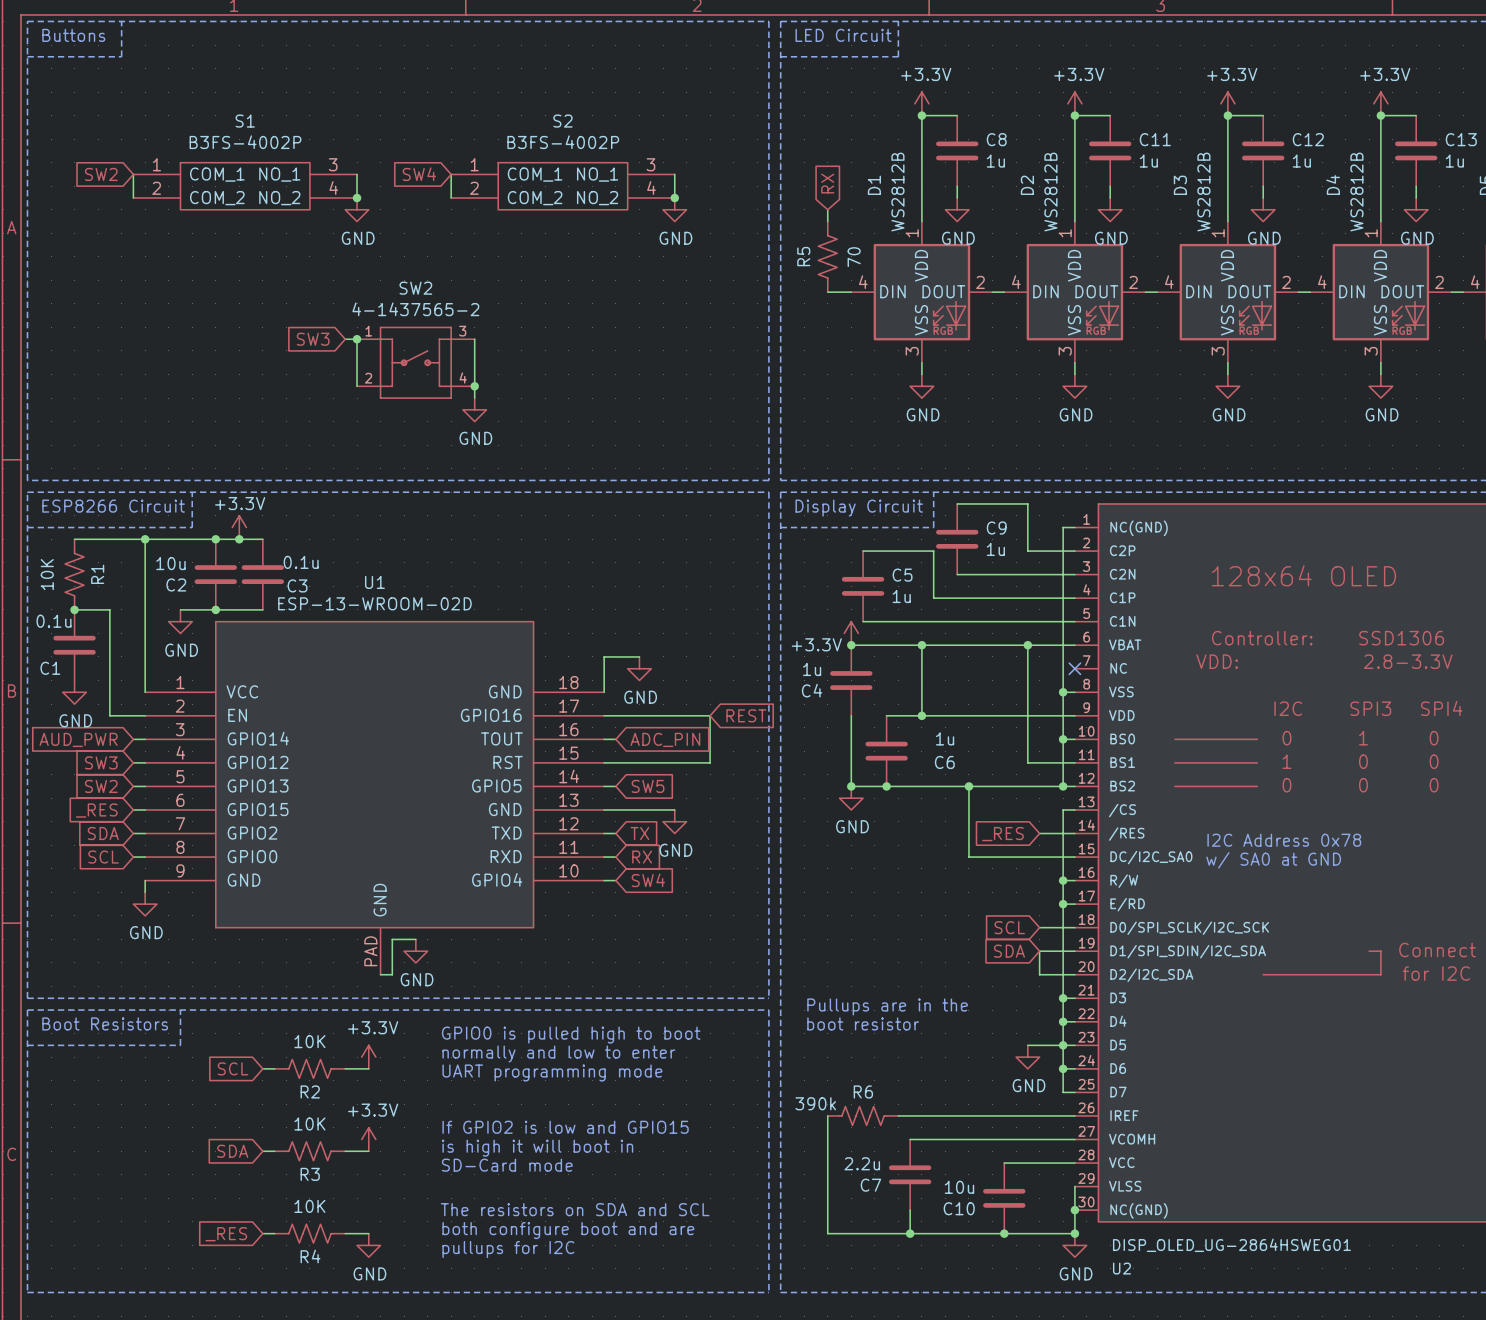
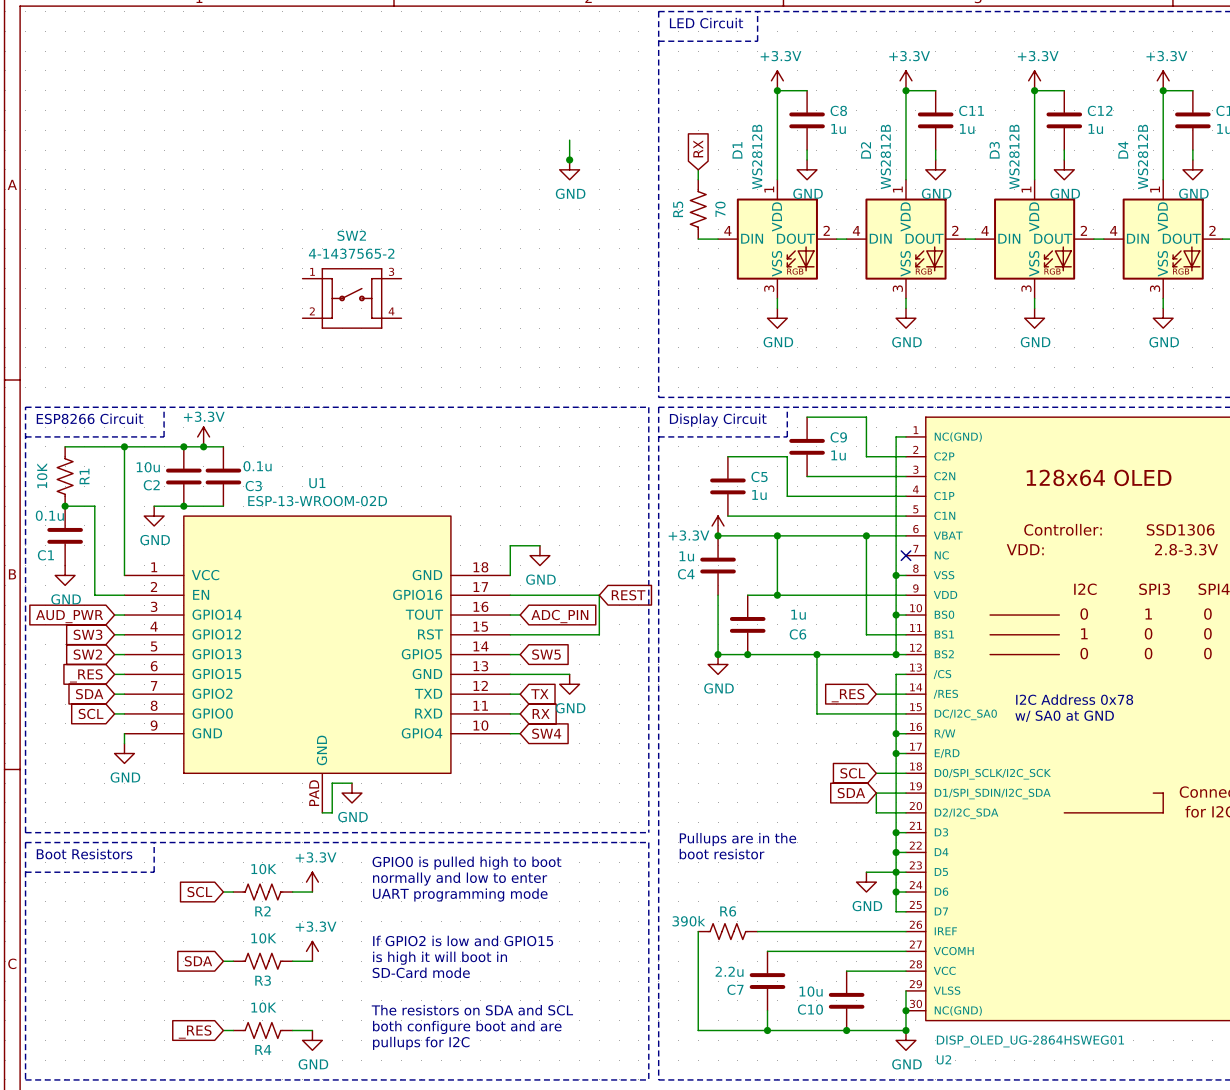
line: (27, 21) (27, 480) (768, 480) (768, 21) (27, 21) -> none
line: (121, 21) (121, 56) (27, 56) -> none
text: Buttons (73, 35) -> none
global label: SW2 (101, 174) -> none
wire: (133, 174) (133, 198) -> none
wire: (357, 174) (357, 198) -> none
global label: SW4 (419, 174) -> none
wire: (451, 174) (451, 198) -> none
S1: B3FS-4002P (245, 186) -> none
S2: B3FS-4002P (562, 186) -> none
junction: (357, 198) -> none
power symbol: GND (357, 209) -> none
global label: SW3 (313, 339) -> none
wire: (345, 339) (357, 339) (357, 386) -> none
junction: (357, 339) -> none
wire: (474, 339) (474, 398) -> none
junction: (474, 386) -> none
power symbol: GND (474, 409) -> none

